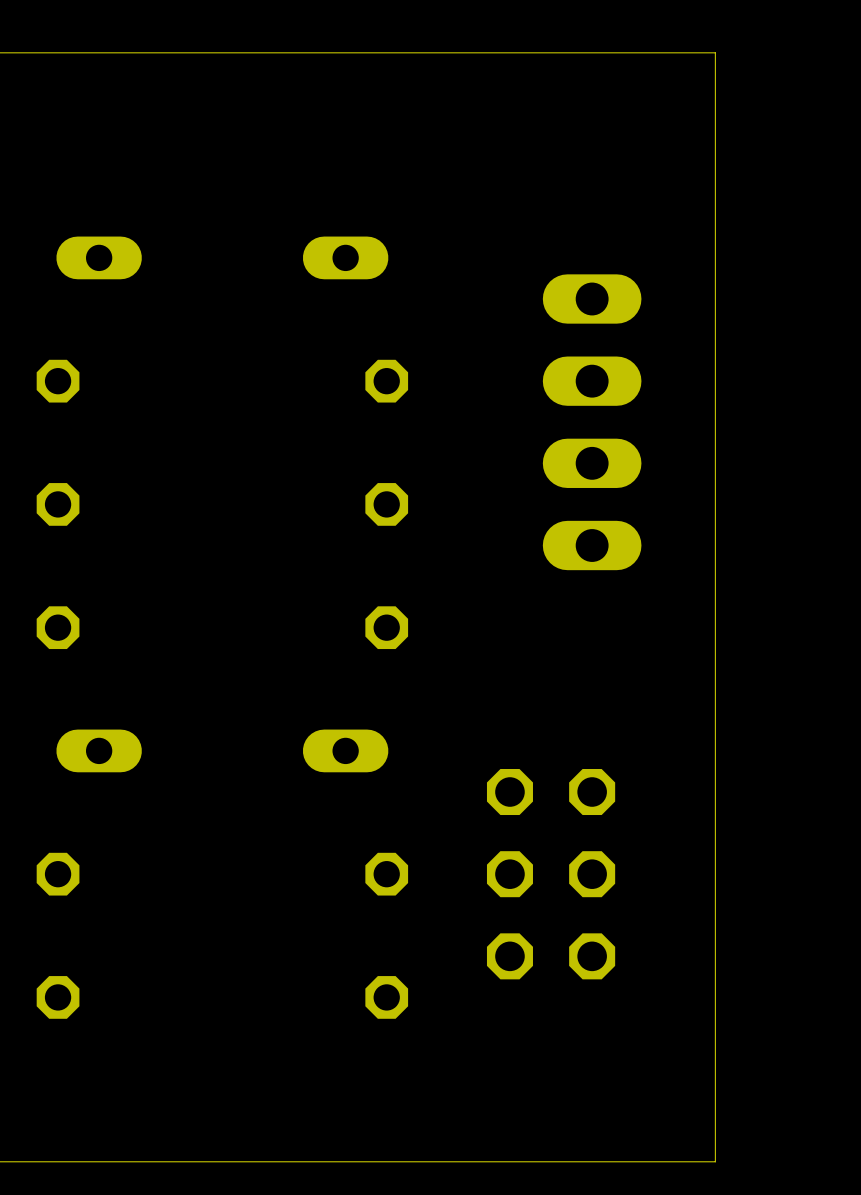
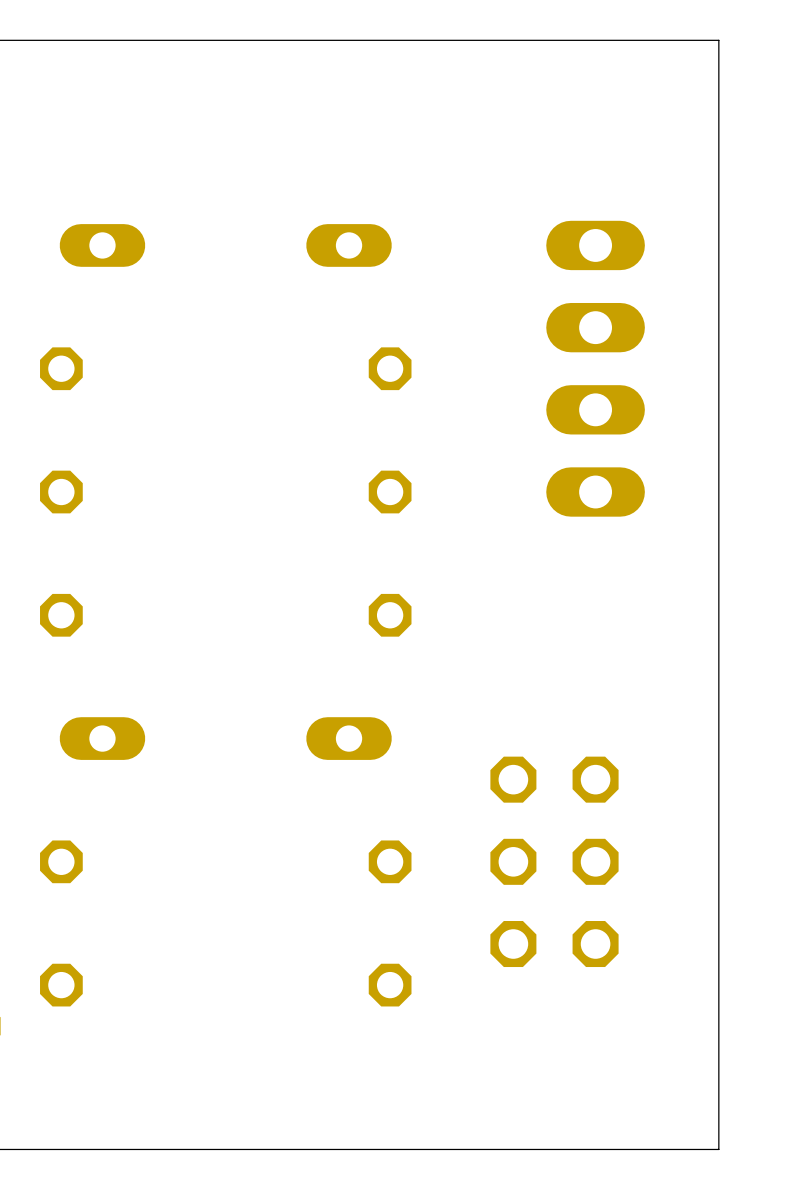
part position: (592, 422) -> (595, 368)

